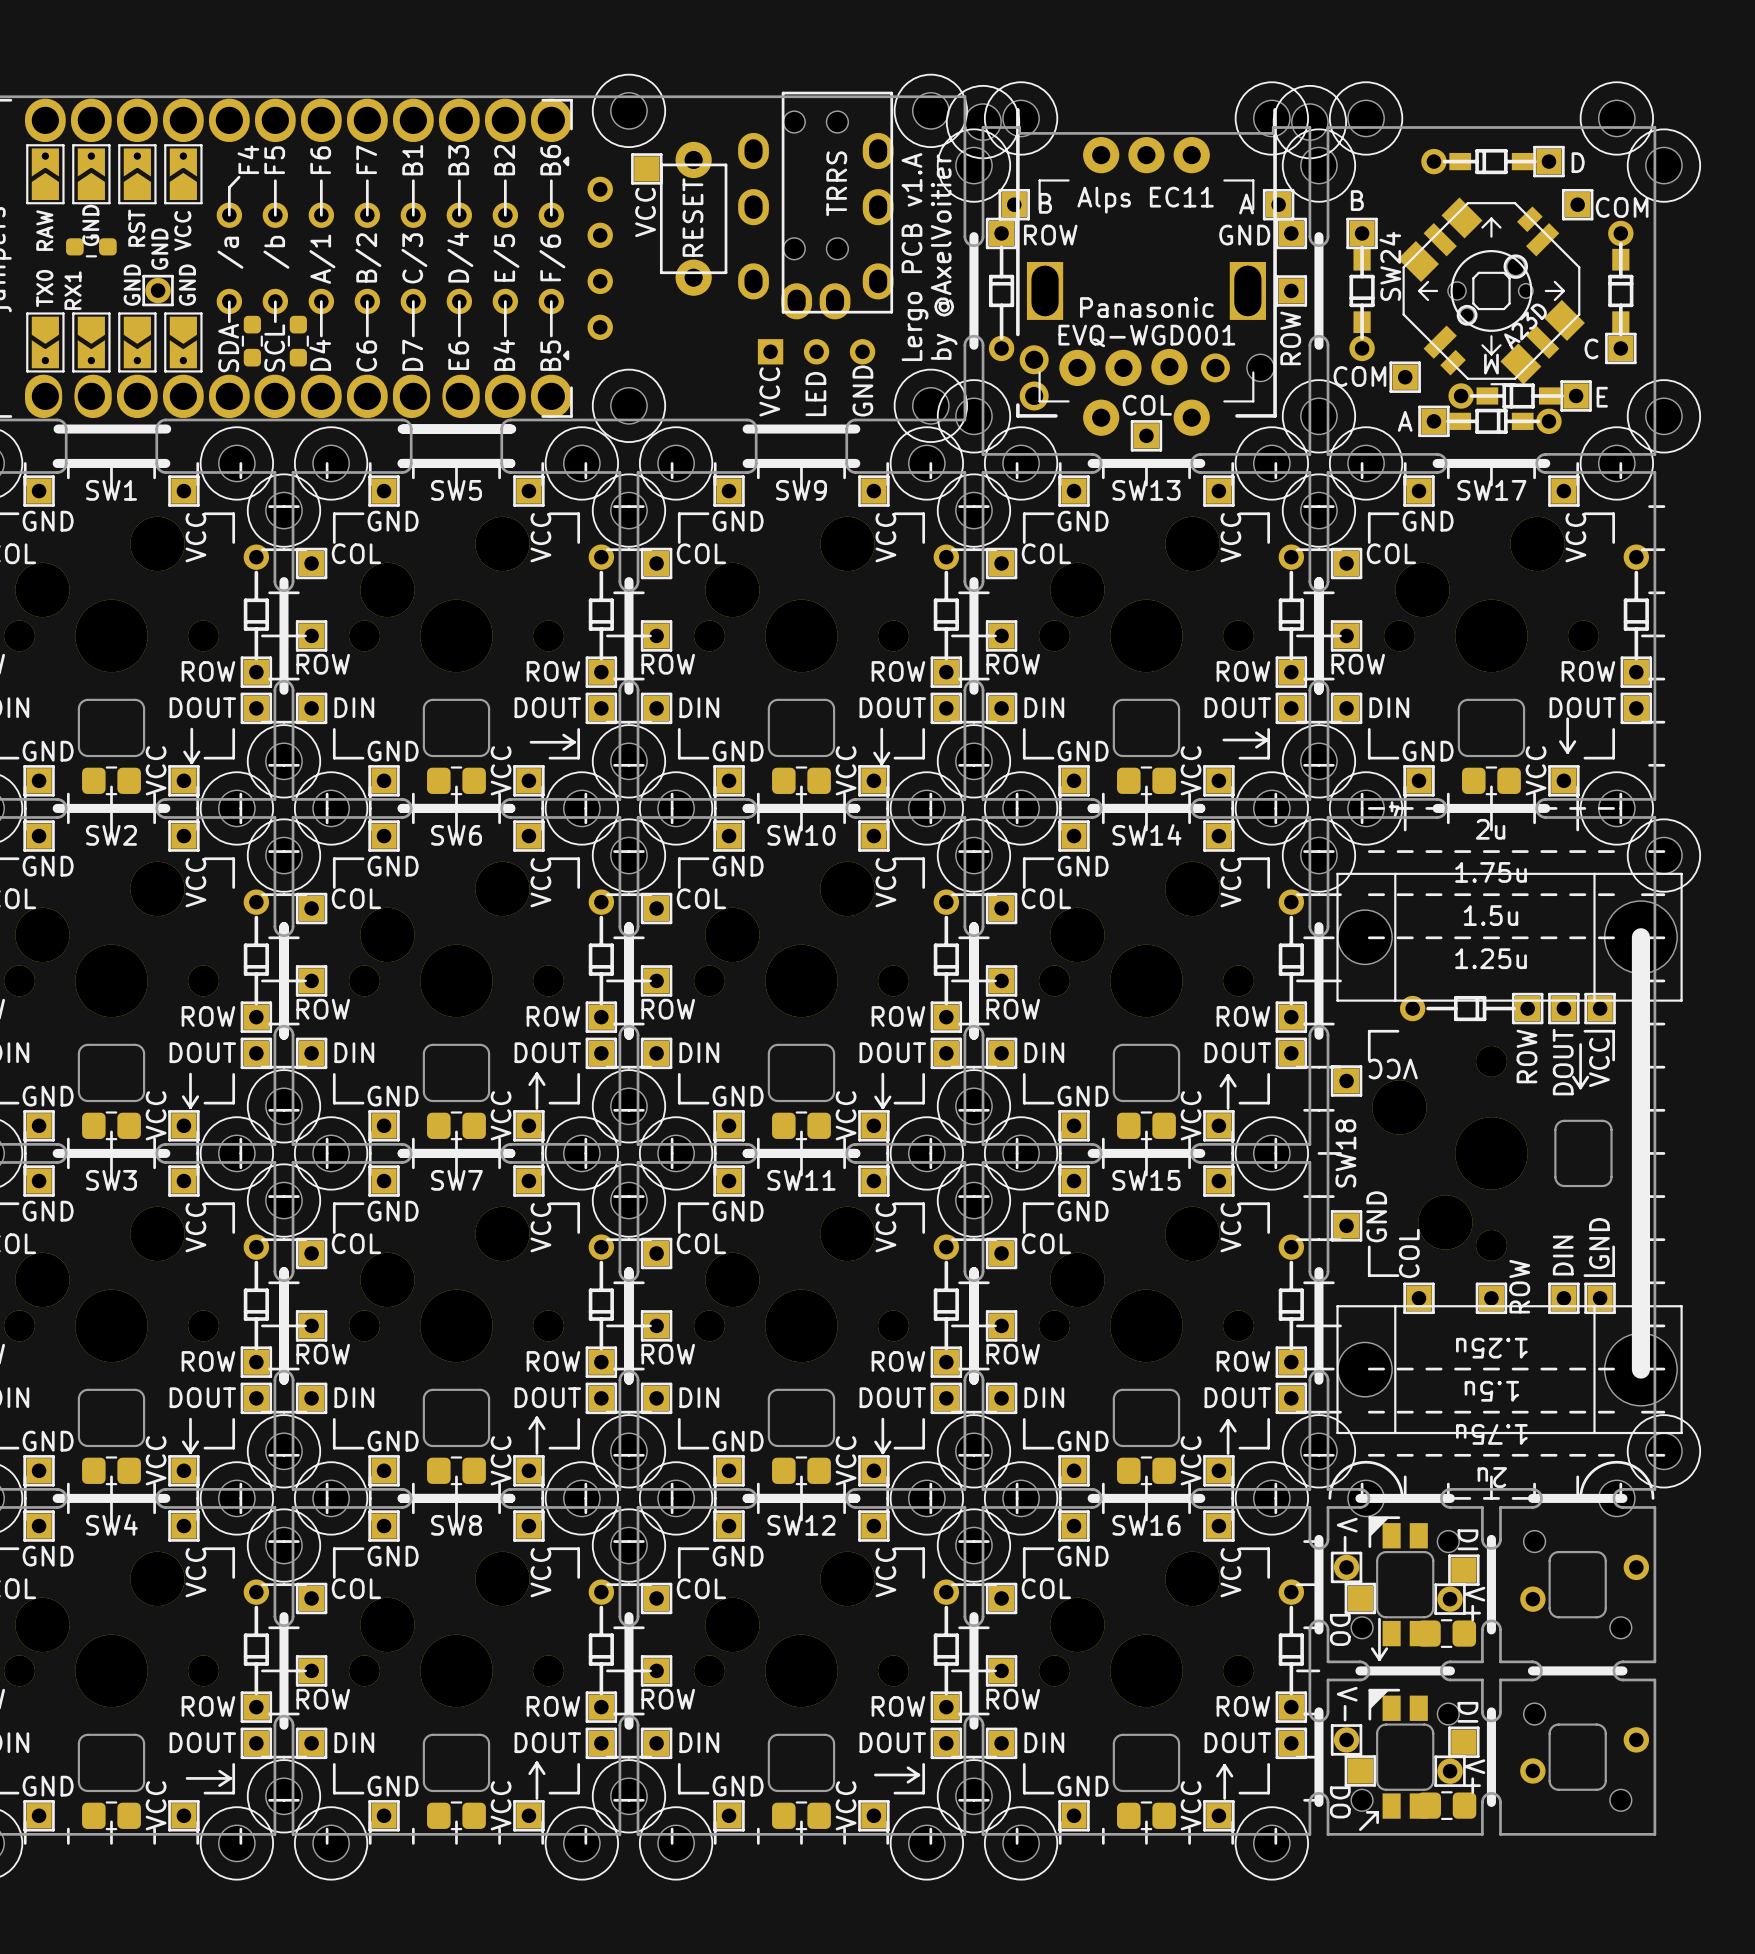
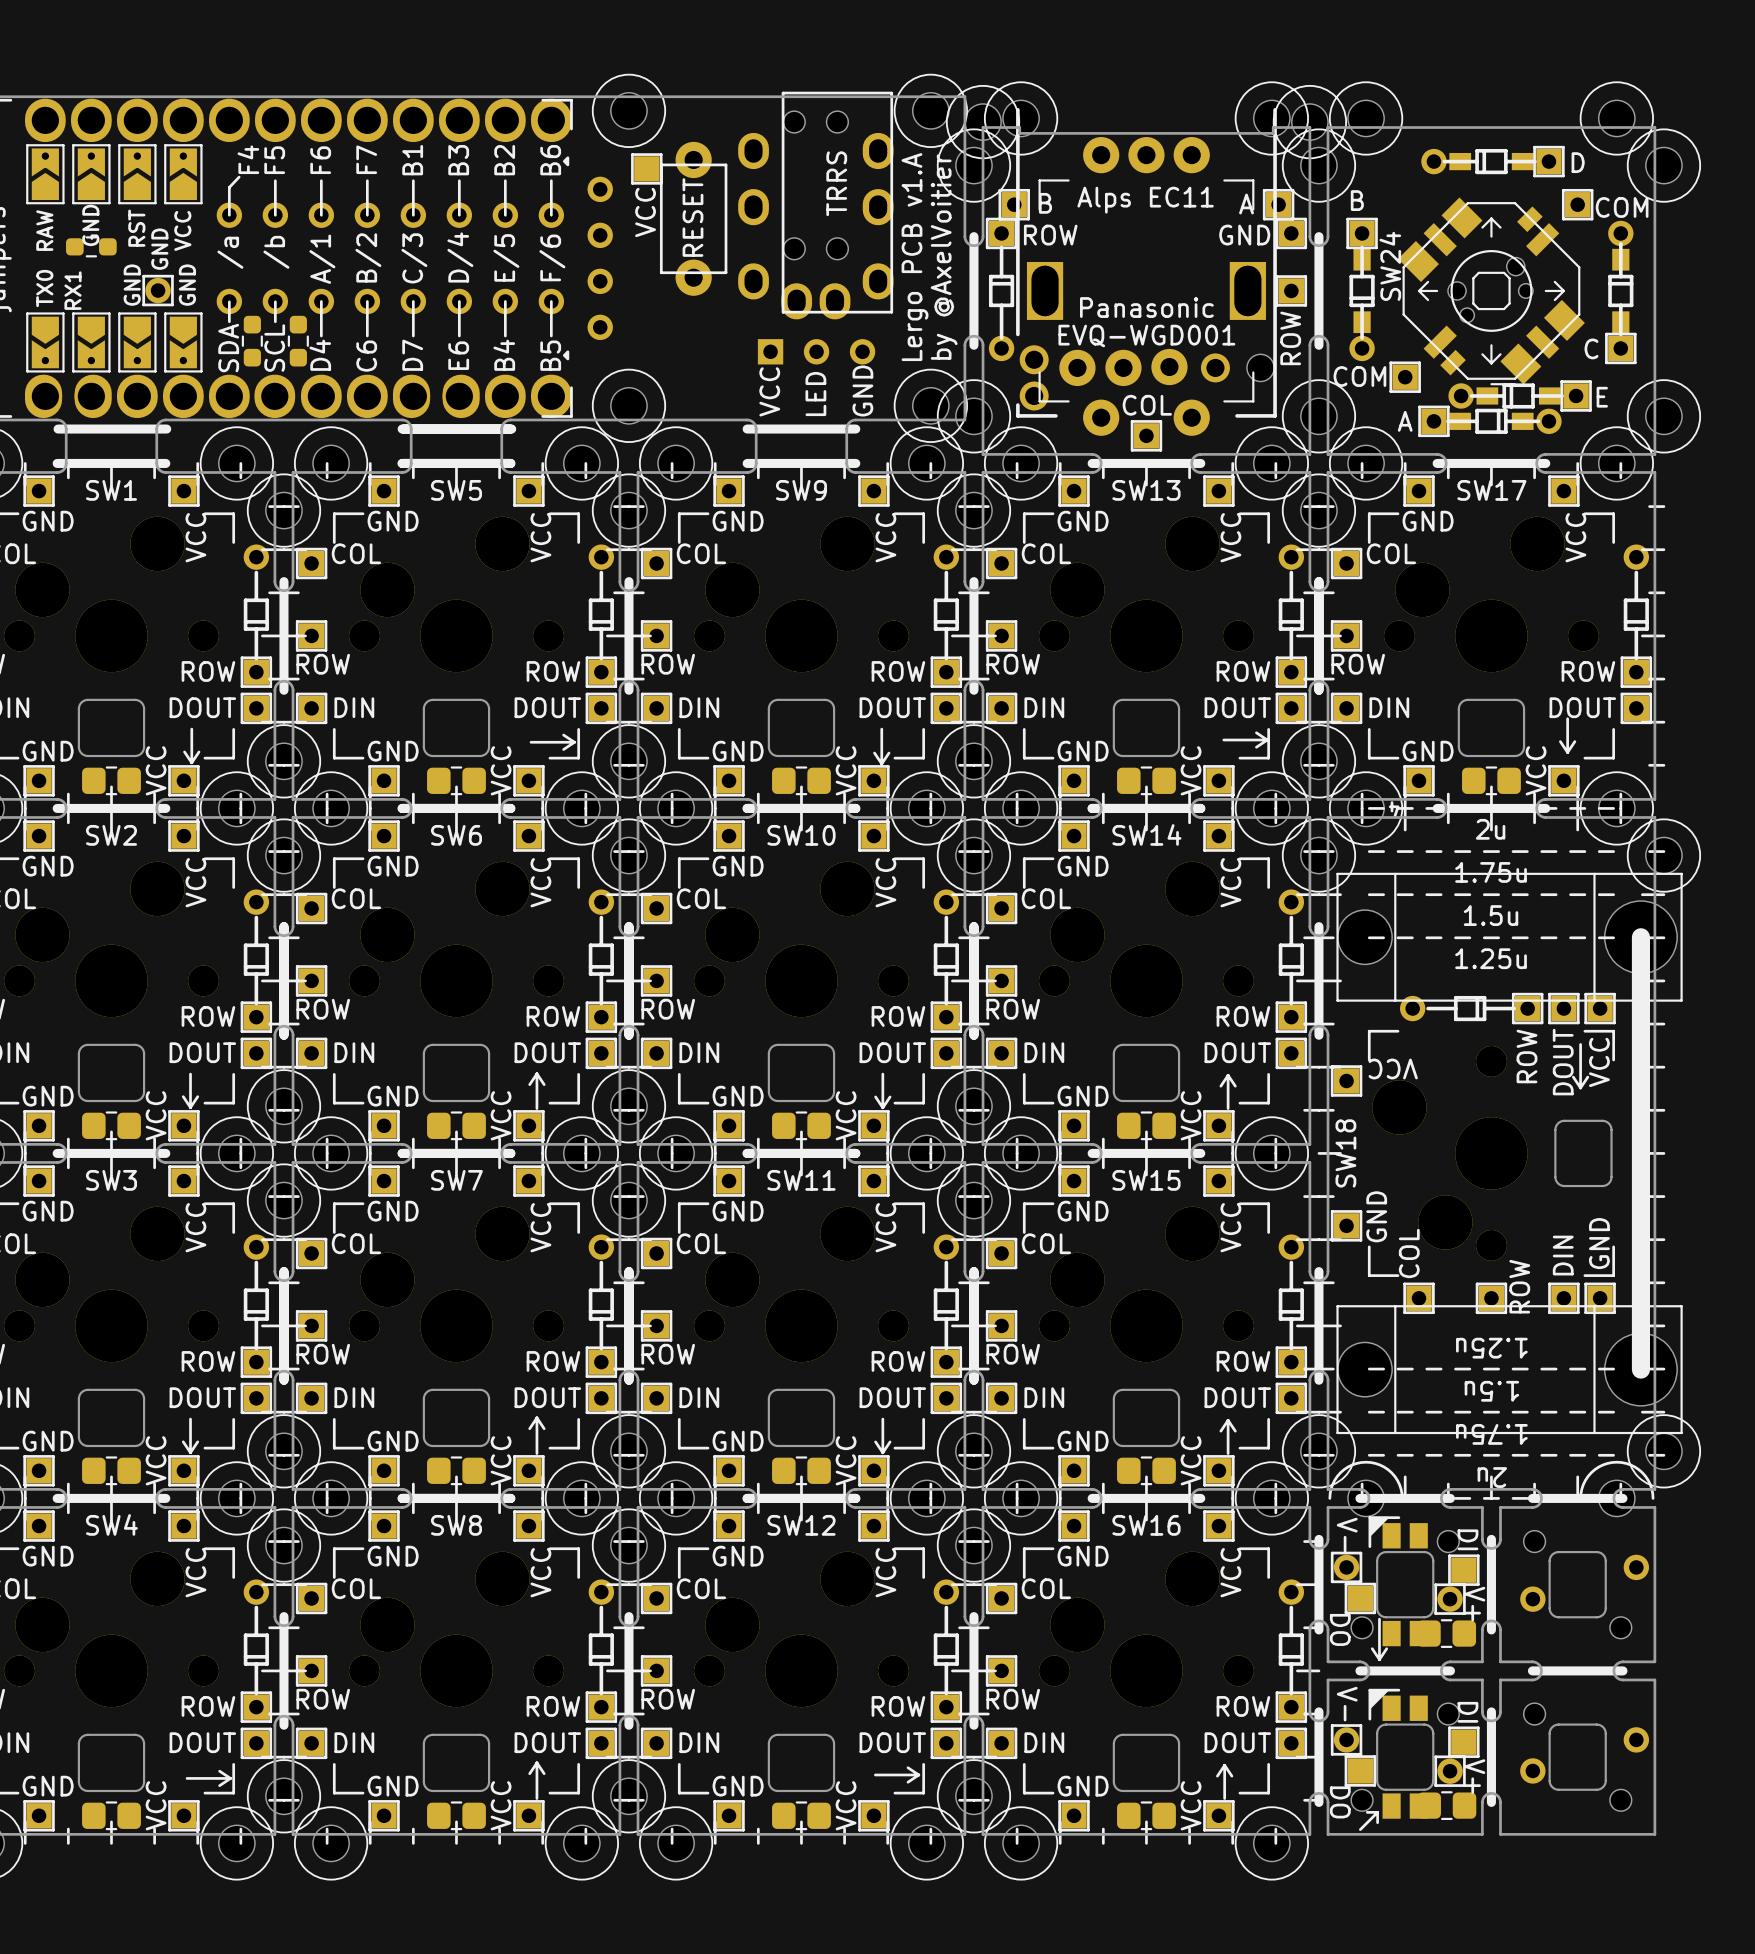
SW24 footprint: [1397, 197, 1585, 386] -> [1397, 197, 1585, 386]

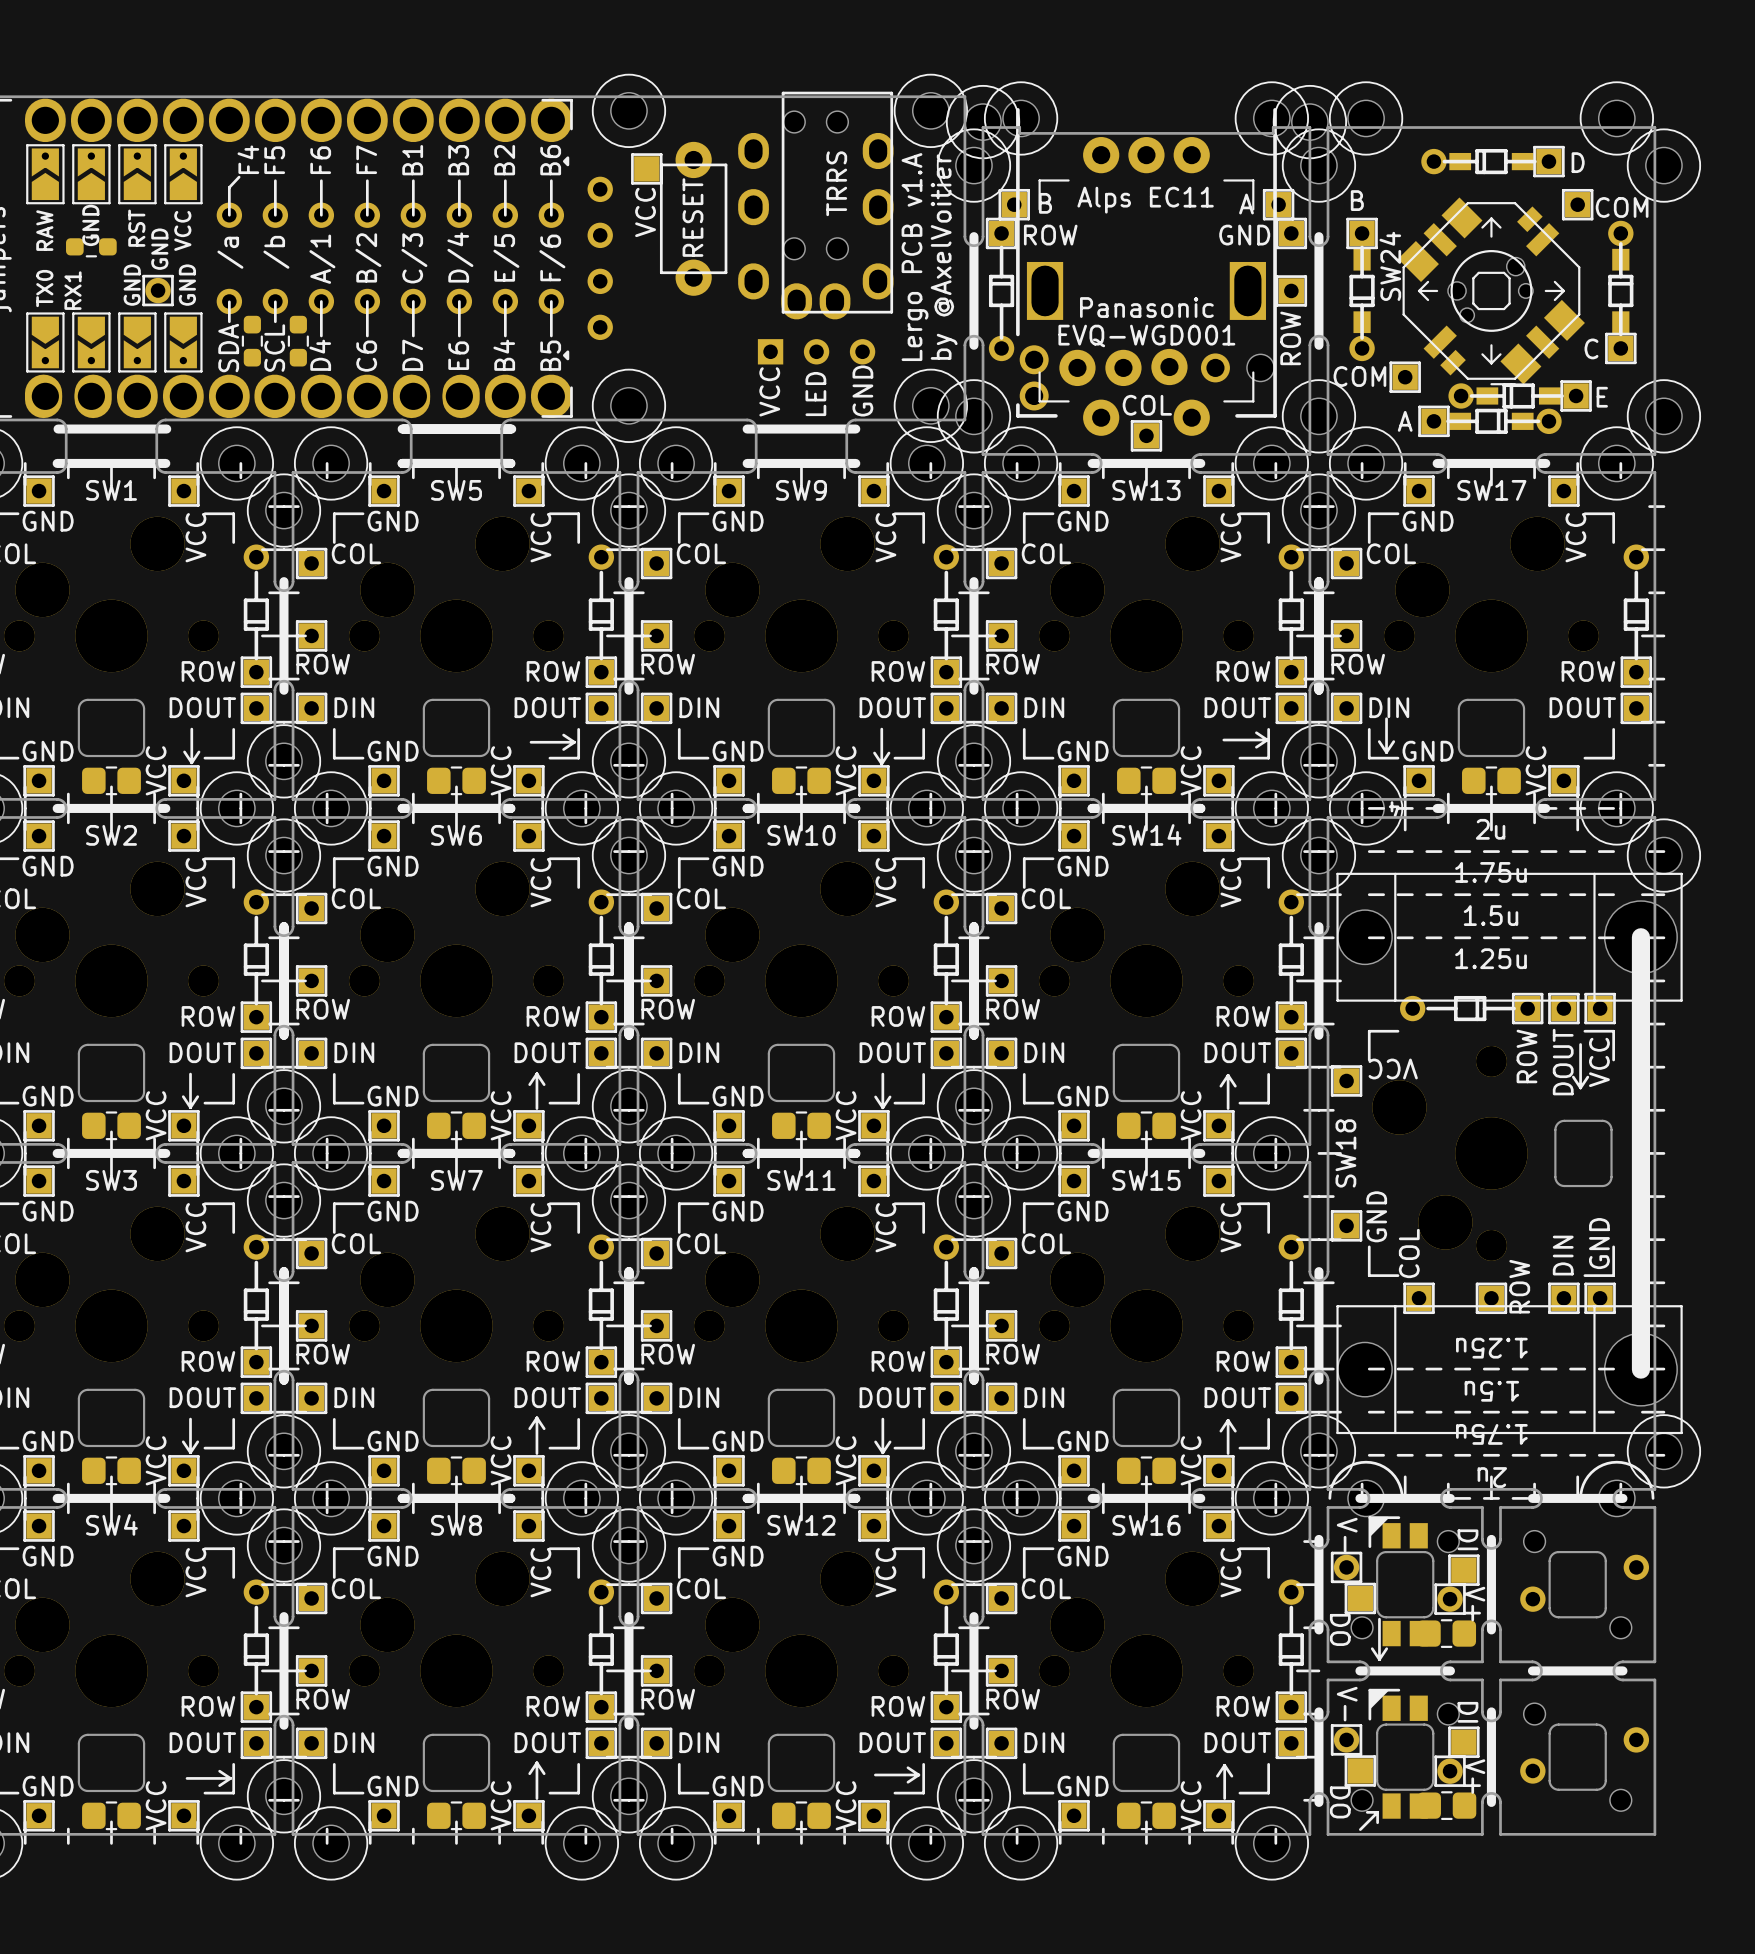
line: (1567, 718) (1567, 752) -> (1386, 718) (1386, 752)
line: (1560, 741) (1567, 752) -> (1379, 741) (1386, 752)
line: (1574, 741) (1567, 752) -> (1393, 741) (1386, 752)

